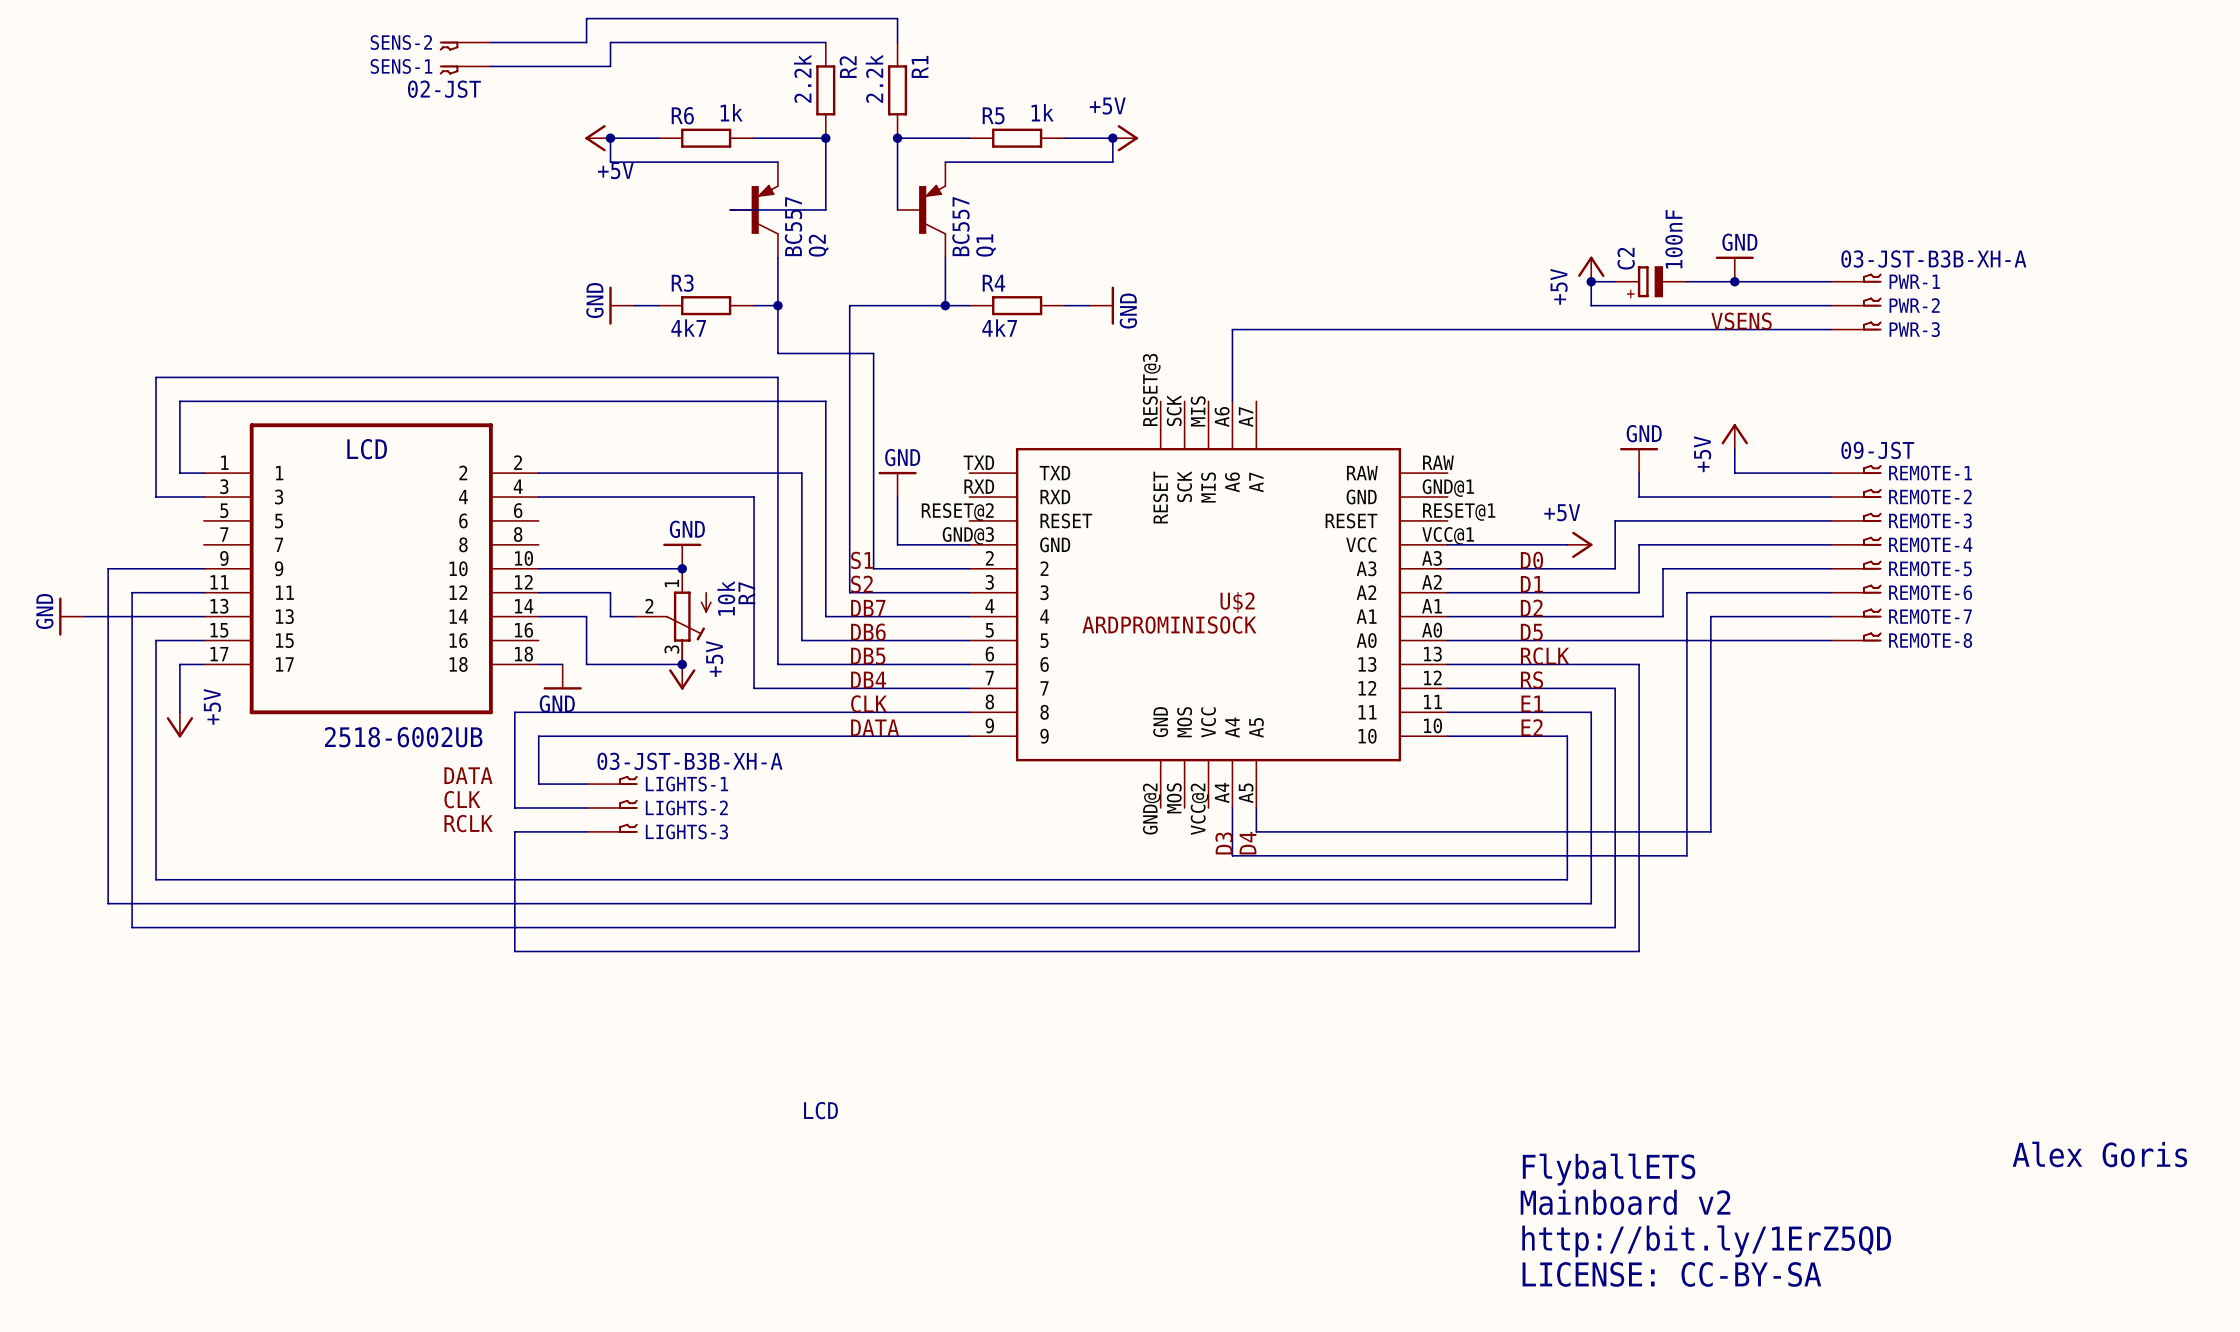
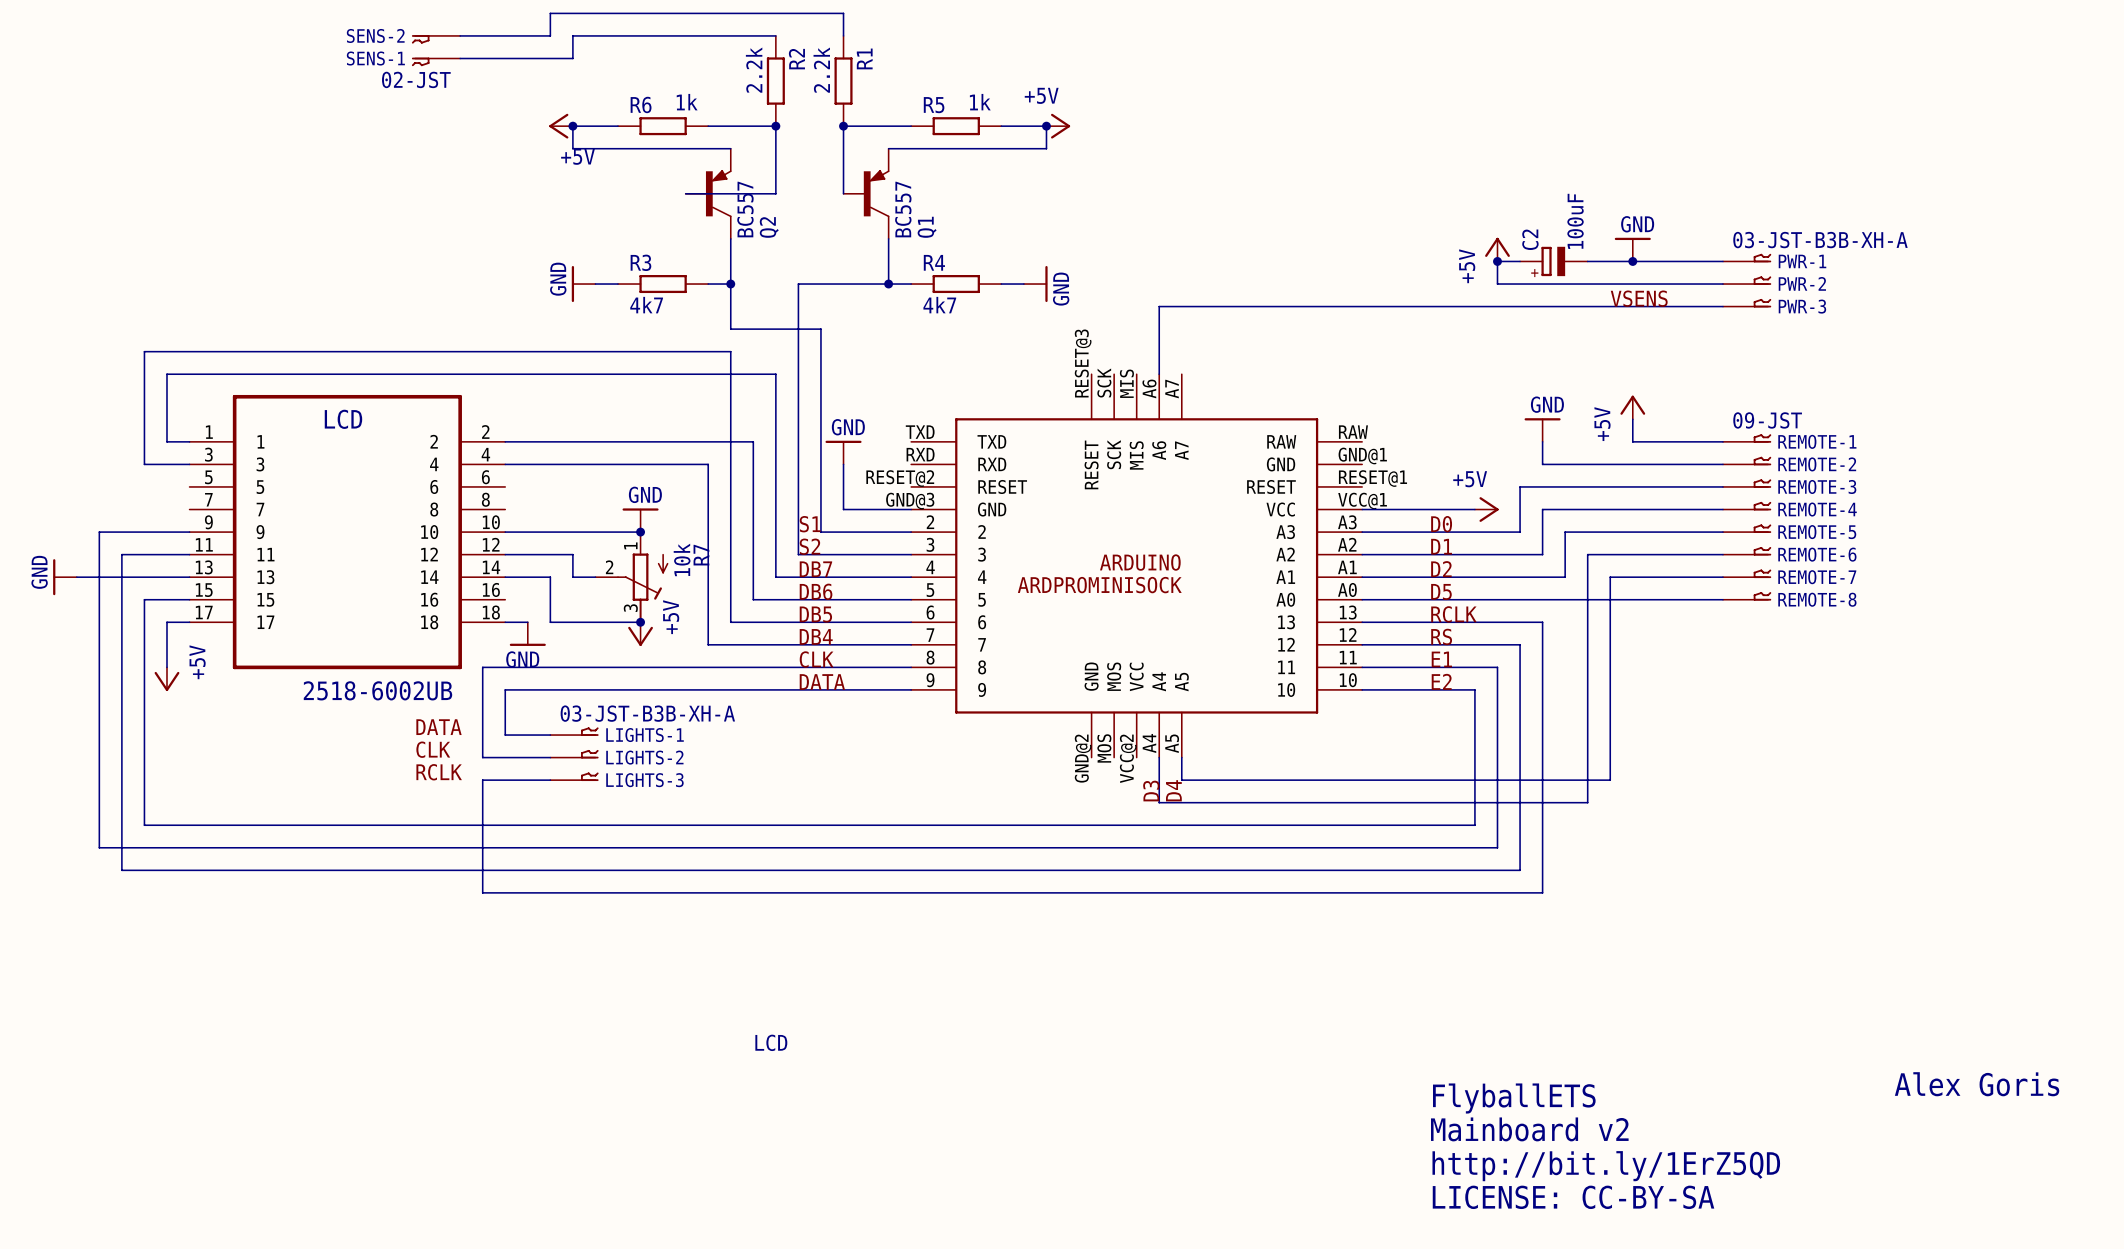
C2 value: 100nF (1674, 239) -> 100uF (1575, 221)
U$2 name: U$2 (1237, 602) -> ARDUINO (1140, 562)

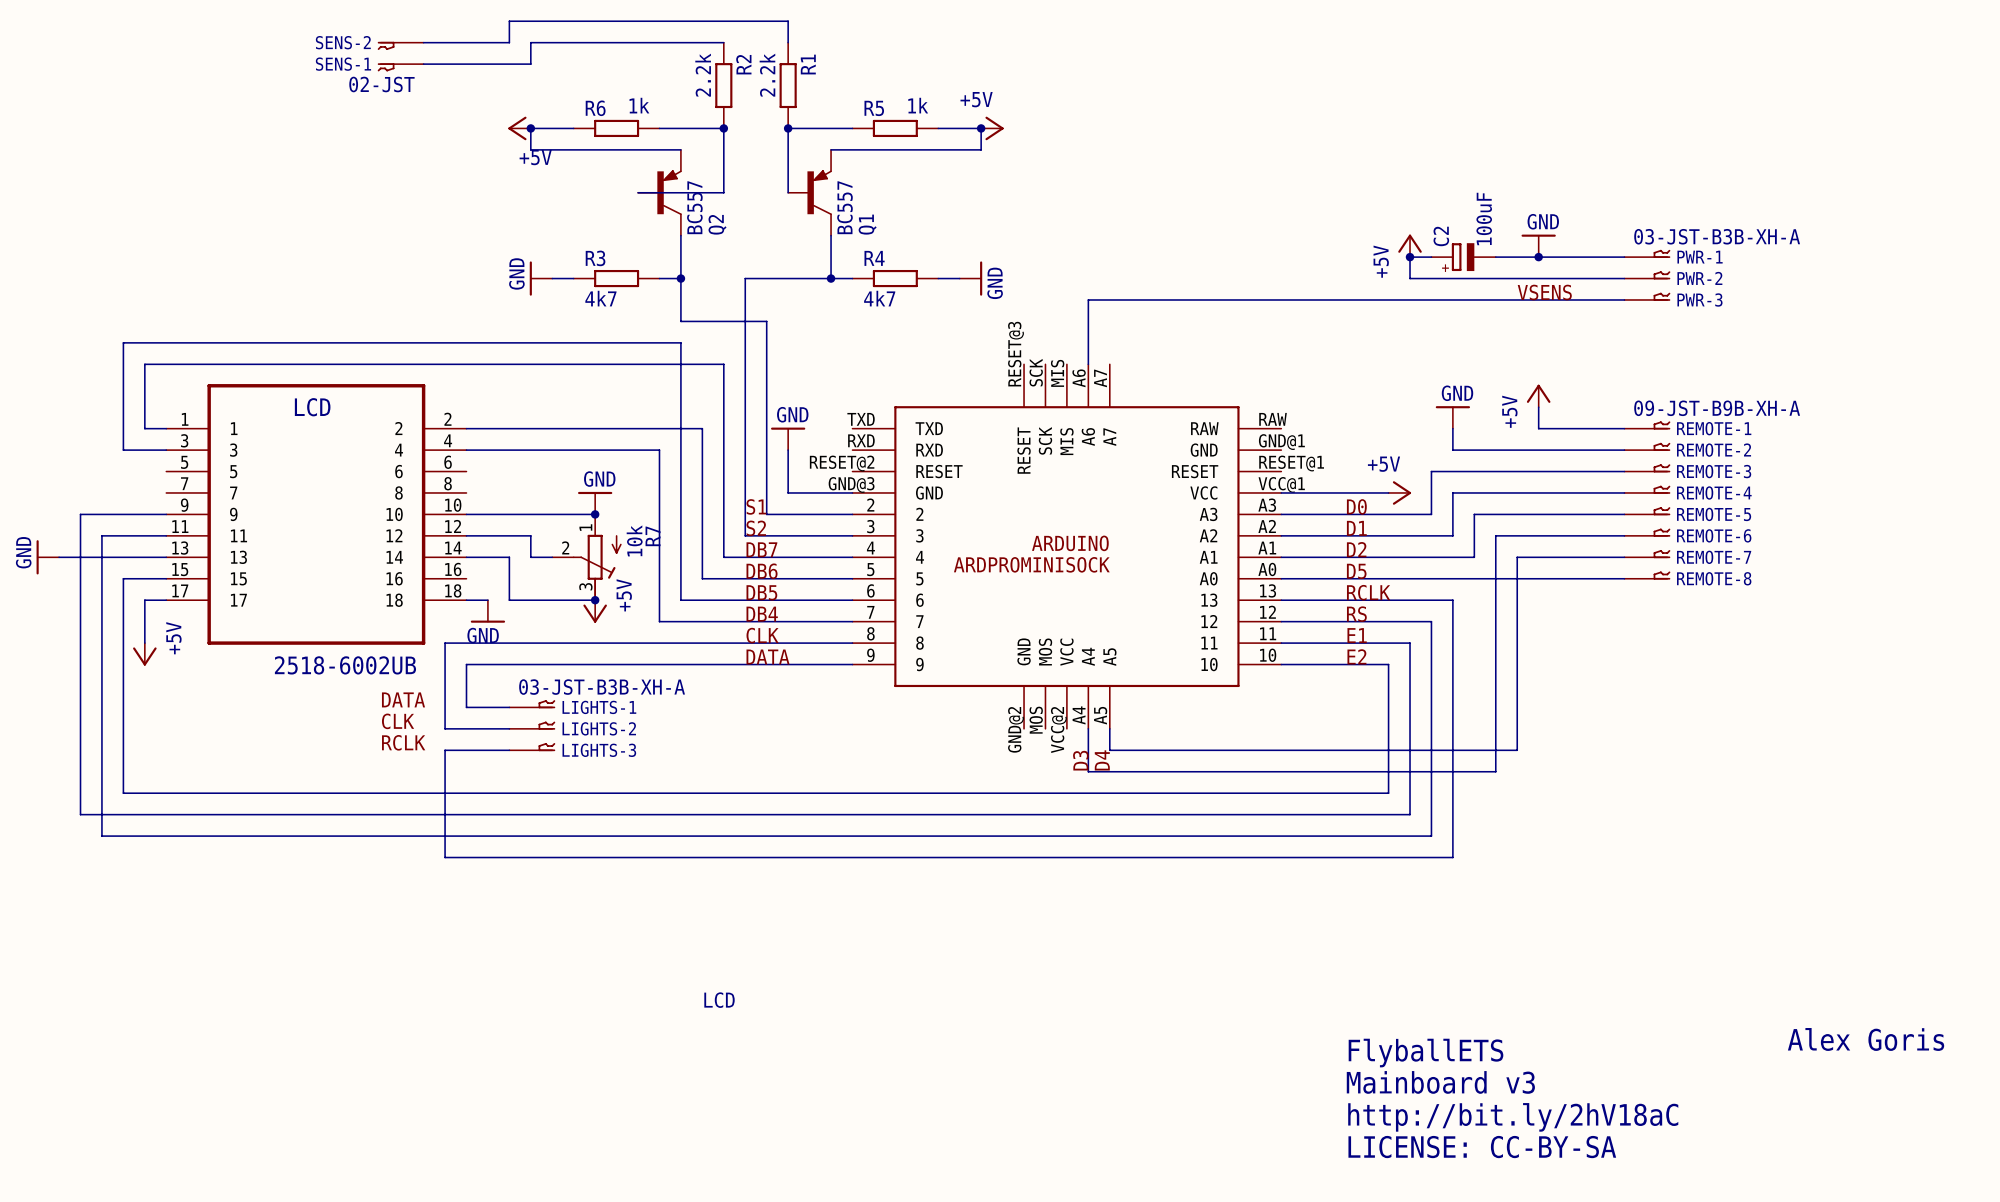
REMOTE-1 value: 09-JST (1767, 420) -> 09-JST-B9B-XH-A (1717, 408)
text: Mainboard v2 (1529, 1129) -> Mainboard v3 (1440, 1082)
text: http://bit.ly/1ErZ5QD (1606, 1166) -> http://bit.ly/2hV18aC (1513, 1117)

